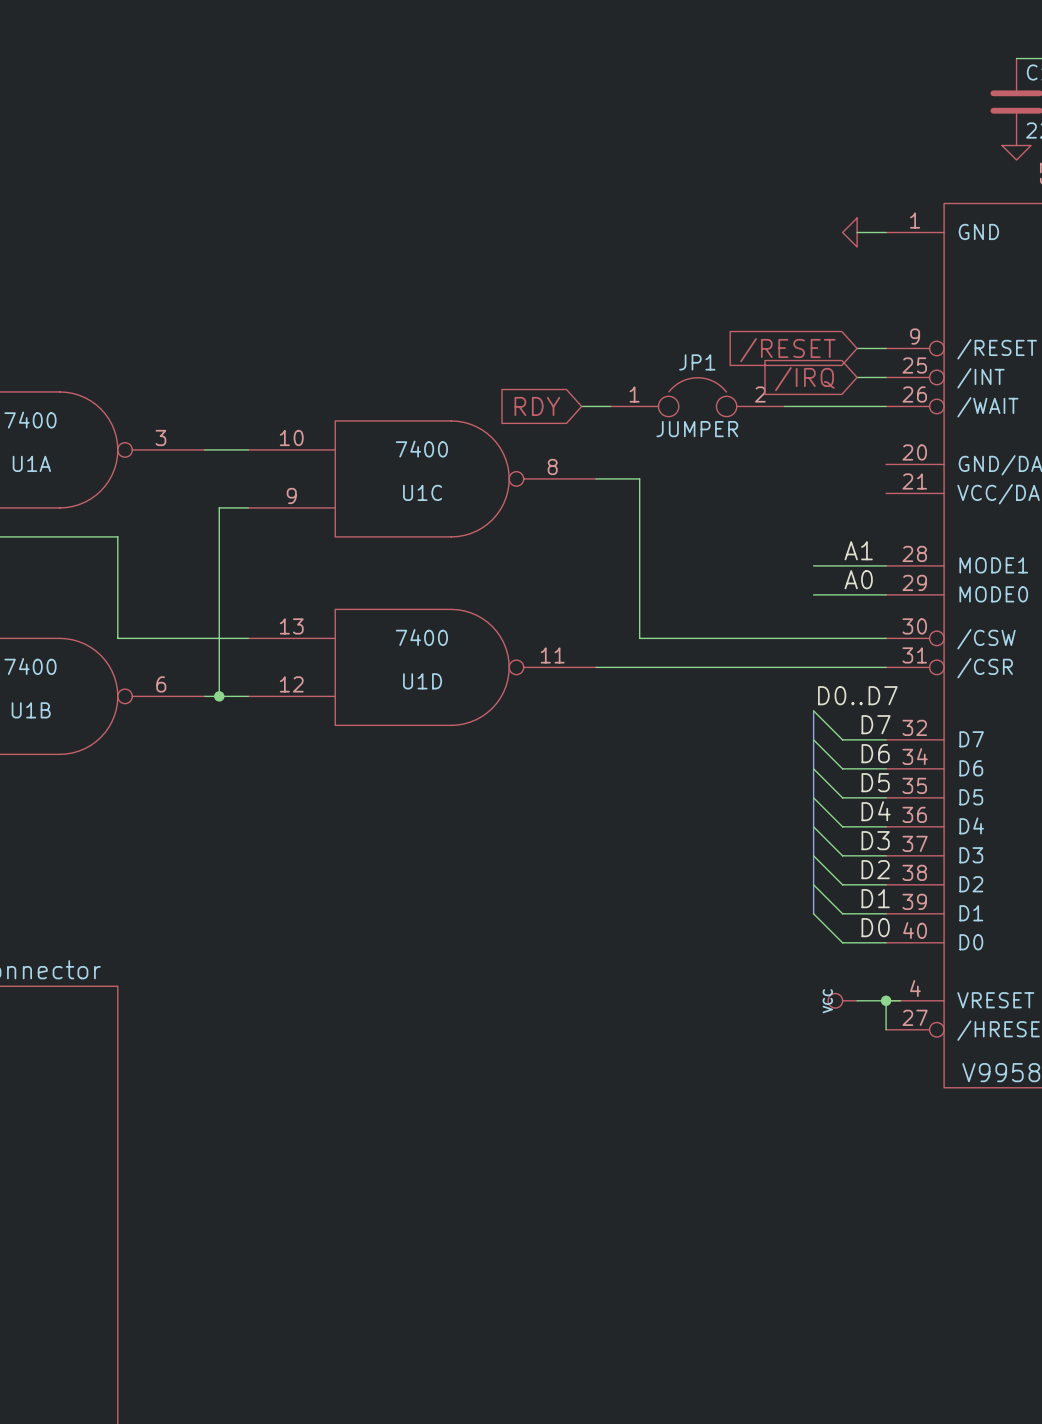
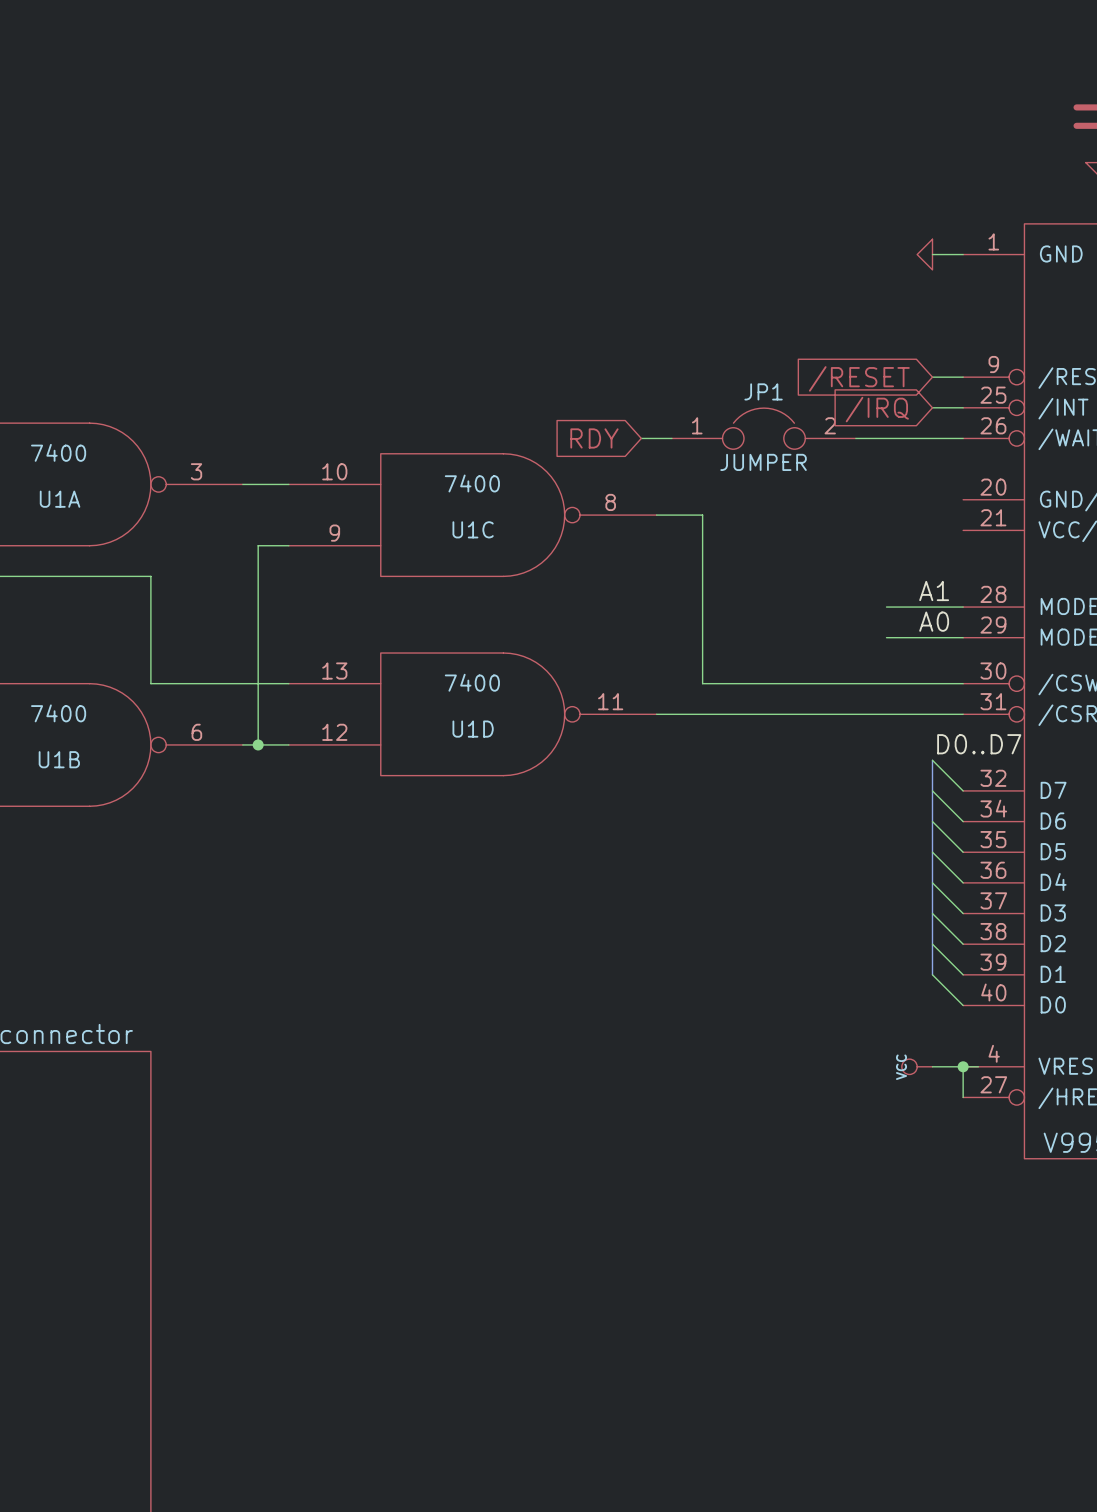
label position: D0..D7 (857, 695) -> D0..D7 (979, 744)
wire: (813, 710) (842, 739) (886, 739) -> (932, 760) (963, 790)
bus: (813, 710) (813, 913) -> (932, 760) (932, 974)
label: D7 (876, 724) -> none
wire: (813, 739) (842, 768) (886, 768) -> (932, 790) (963, 821)
label: D6 (875, 753) -> none
wire: (813, 768) (842, 797) (886, 797) -> (932, 821) (963, 852)
label: D5 (875, 782) -> none
wire: (813, 797) (842, 826) (886, 826) -> (932, 852) (963, 882)
label: D4 (876, 811) -> none
wire: (813, 826) (842, 855) (886, 855) -> (932, 882) (963, 913)
label: D3 (875, 840) -> none
wire: (813, 855) (842, 884) (886, 884) -> (932, 913) (963, 944)
label: D2 (875, 869) -> none
wire: (813, 884) (842, 913) (886, 913) -> (932, 944) (963, 974)
label: D1 (875, 898) -> none
wire: (813, 913) (842, 942) (886, 942) -> (932, 974) (963, 1005)
label: D0 (875, 927) -> none

